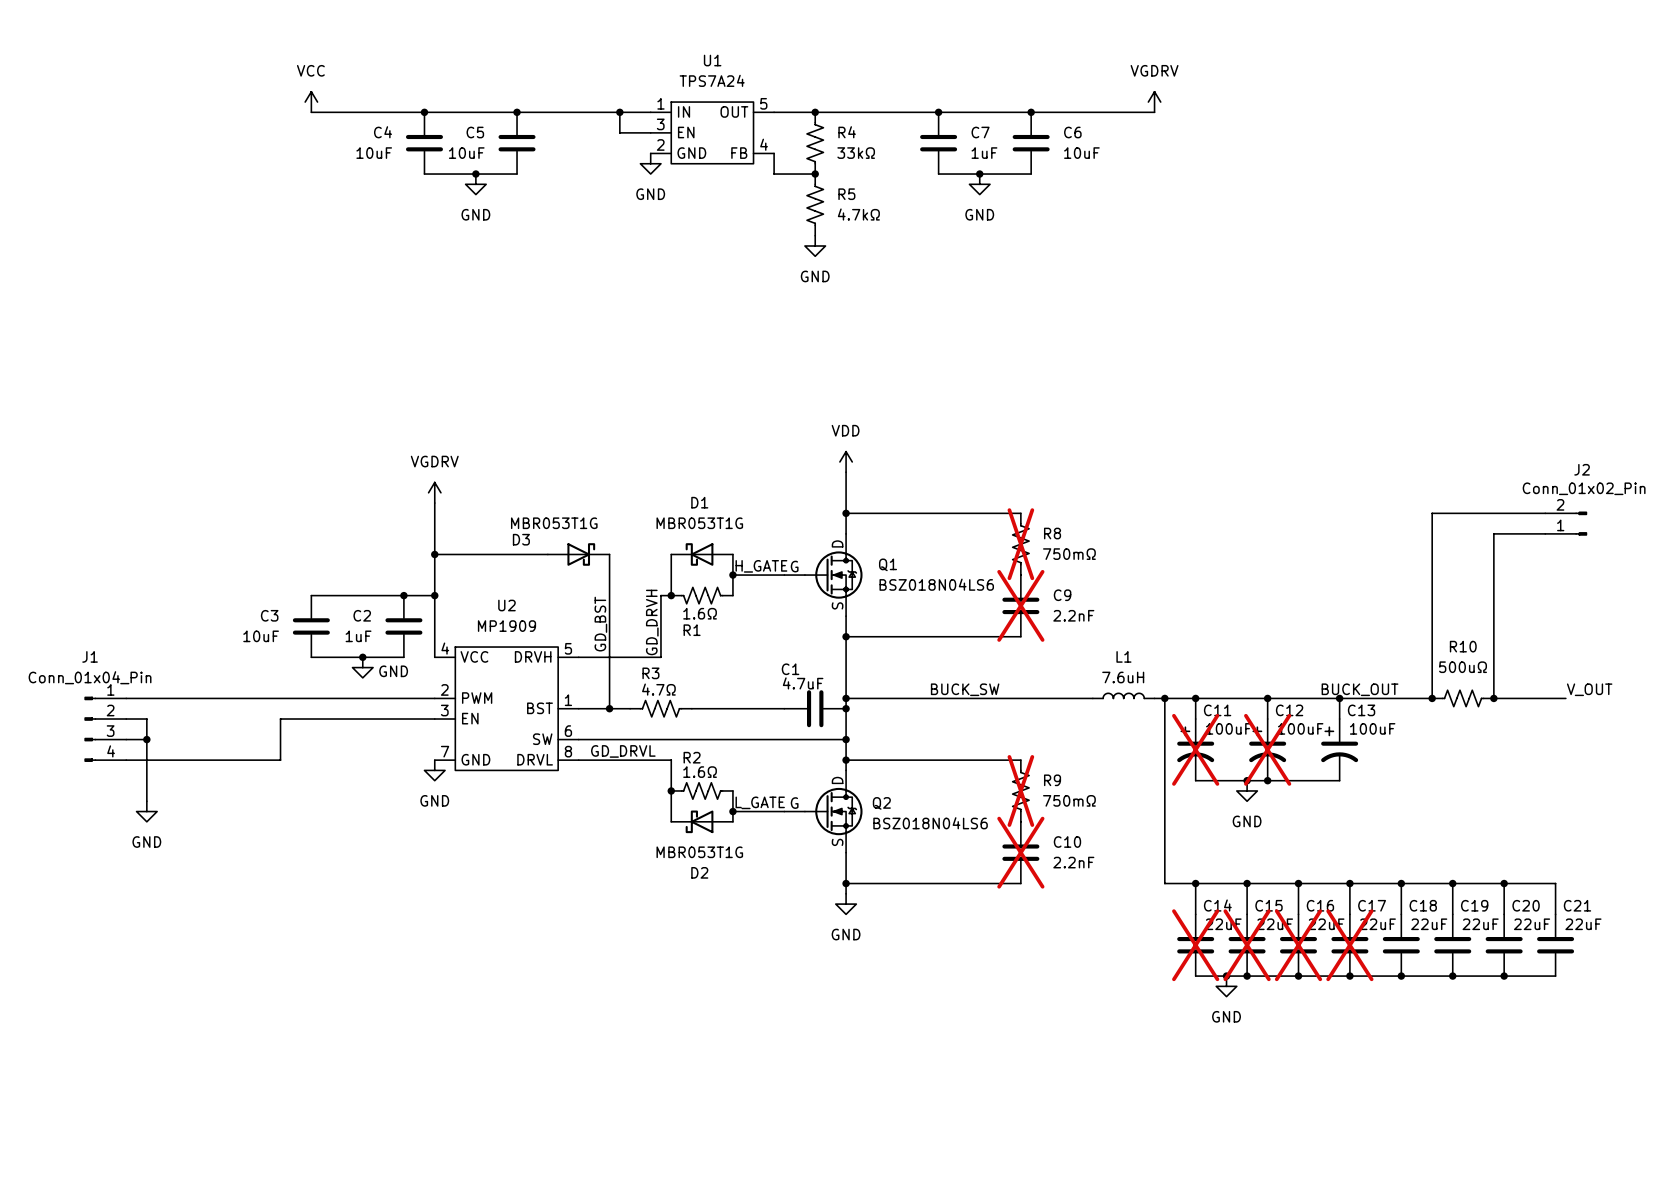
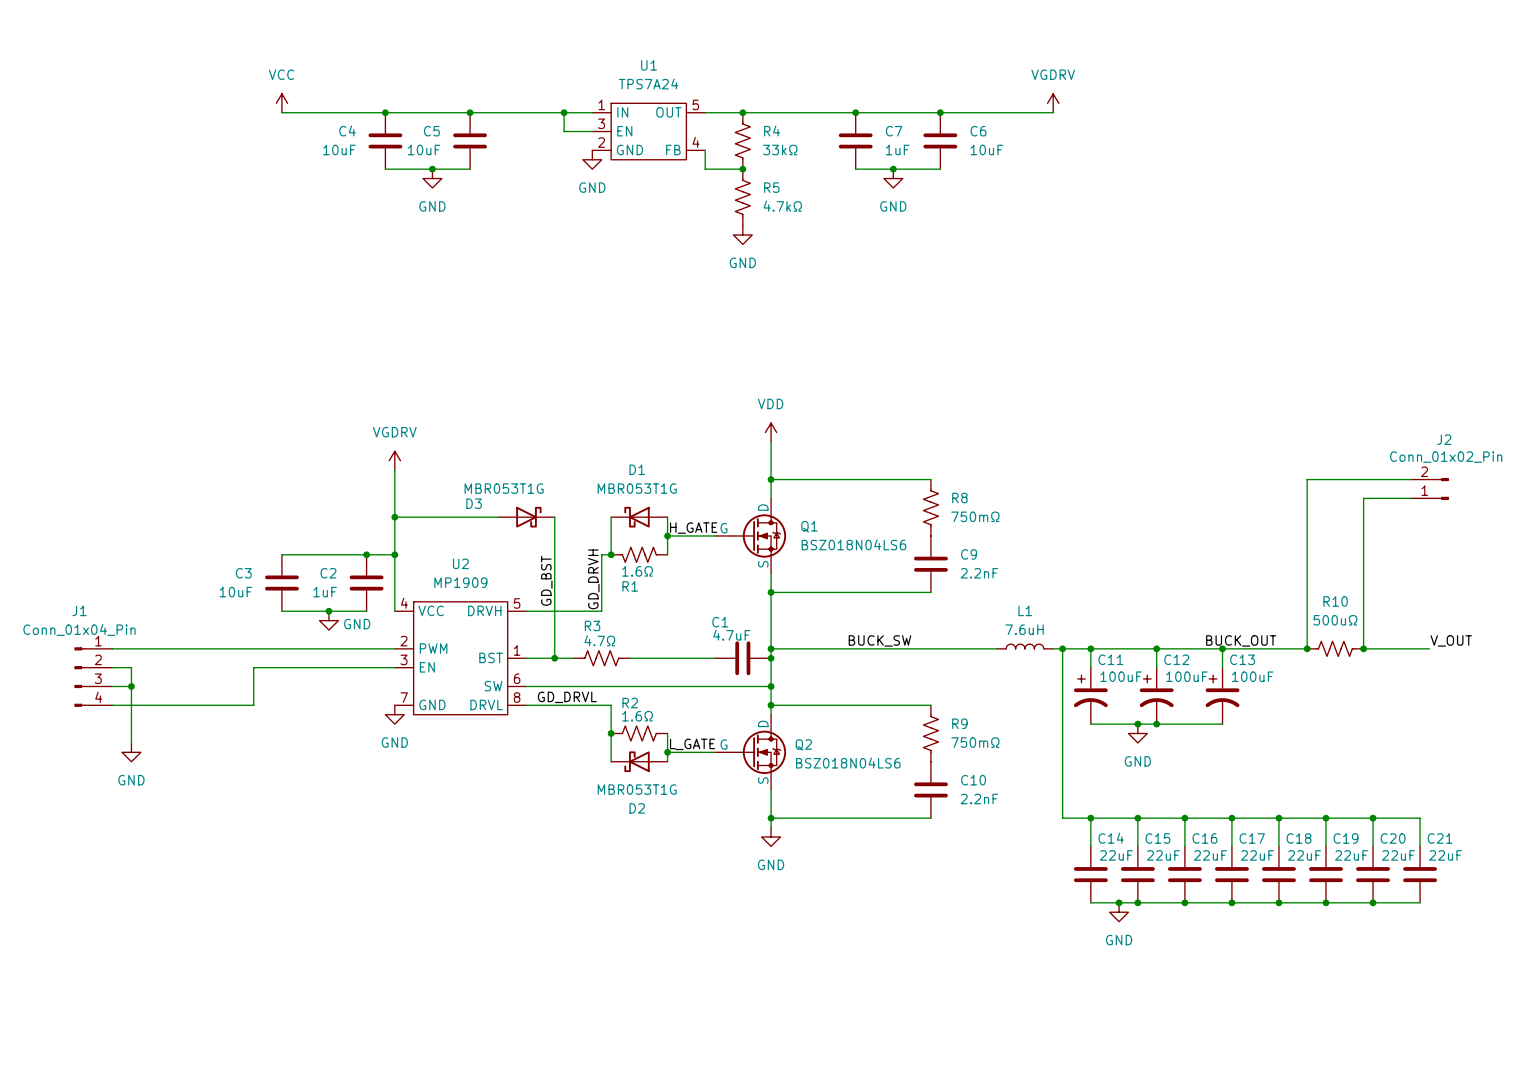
R8 do-not-place cross: (1020, 544) -> none
C9 do-not-place cross: (1020, 605) -> none
C11 do-not-place cross: (1195, 749) -> none
C12 do-not-place cross: (1267, 749) -> none
R9 do-not-place cross: (1020, 790) -> none
C10 do-not-place cross: (1020, 852) -> none
C14 do-not-place cross: (1195, 945) -> none
C15 do-not-place cross: (1247, 945) -> none
C16 do-not-place cross: (1298, 945) -> none
C17 do-not-place cross: (1349, 945) -> none

